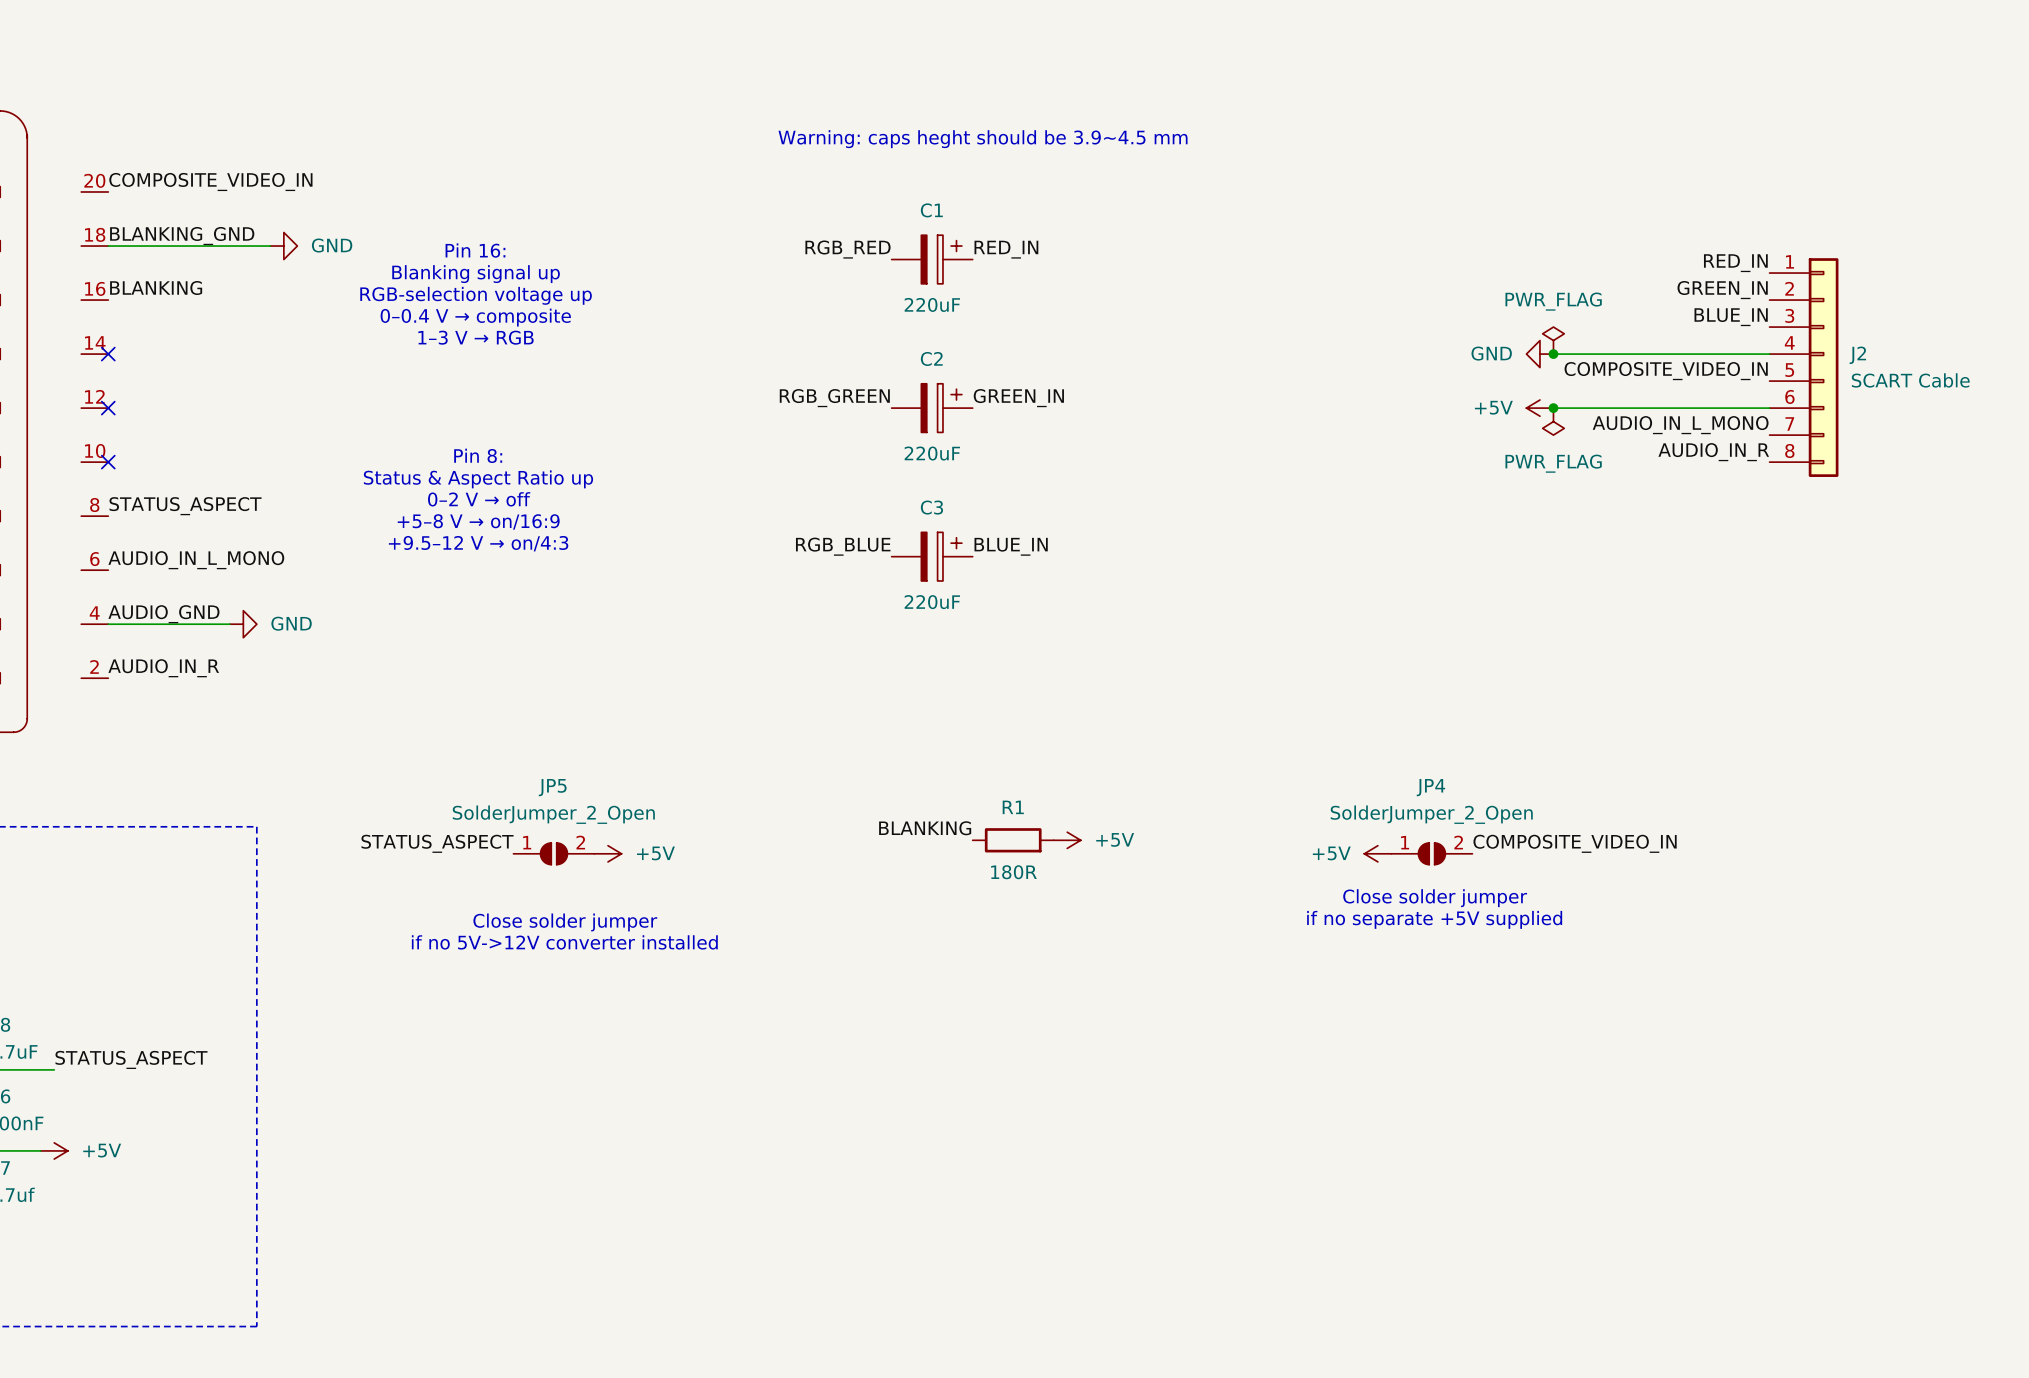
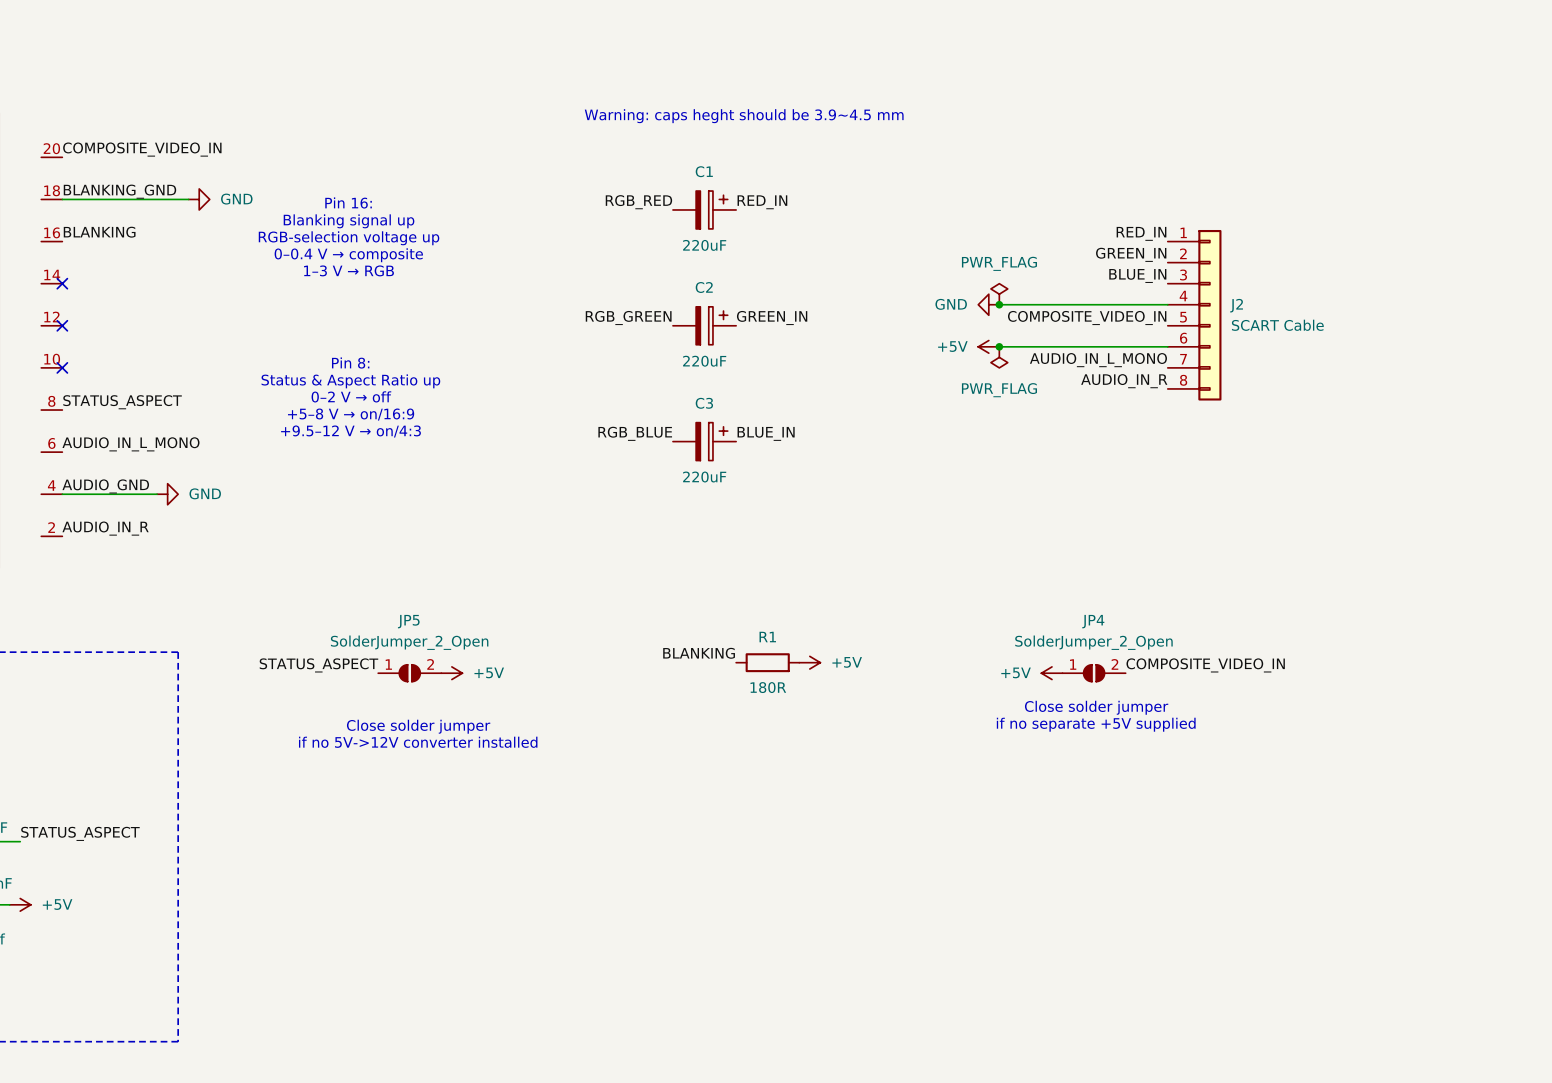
label position: RED_IN (1735, 263) -> RED_IN (1141, 233)
label position: GREEN_IN (1722, 290) -> GREEN_IN (1131, 254)
label position: BLUE_IN (1731, 317) -> BLUE_IN (1137, 275)
power symbol: PWR_FLAG (1553, 340) -> none
power symbol position: GND (1539, 354) -> GND (988, 304)
wire: (1553, 354) (1769, 354) -> (999, 304) (1167, 304)
junction: (1553, 354) -> none
power symbol: none -> PWR_FLAG (999, 294)
J2 position: (1804, 367) -> (1194, 315)
label position: COMPOSITE_VIDEO_IN (1666, 371) -> COMPOSITE_VIDEO_IN (1087, 318)
junction: none -> (999, 304)
power symbol position: +5V (1539, 408) -> +5V (988, 346)
wire: (1553, 408) (1769, 408) -> (999, 346) (1167, 346)
junction: (1553, 408) -> none
power symbol: PWR_FLAG (1553, 421) -> none
label position: AUDIO_IN_L_MONO (1680, 425) -> AUDIO_IN_L_MONO (1098, 360)
junction: none -> (999, 346)
power symbol: none -> PWR_FLAG (999, 357)
label position: AUDIO_IN_R (1713, 452) -> AUDIO_IN_R (1124, 381)

